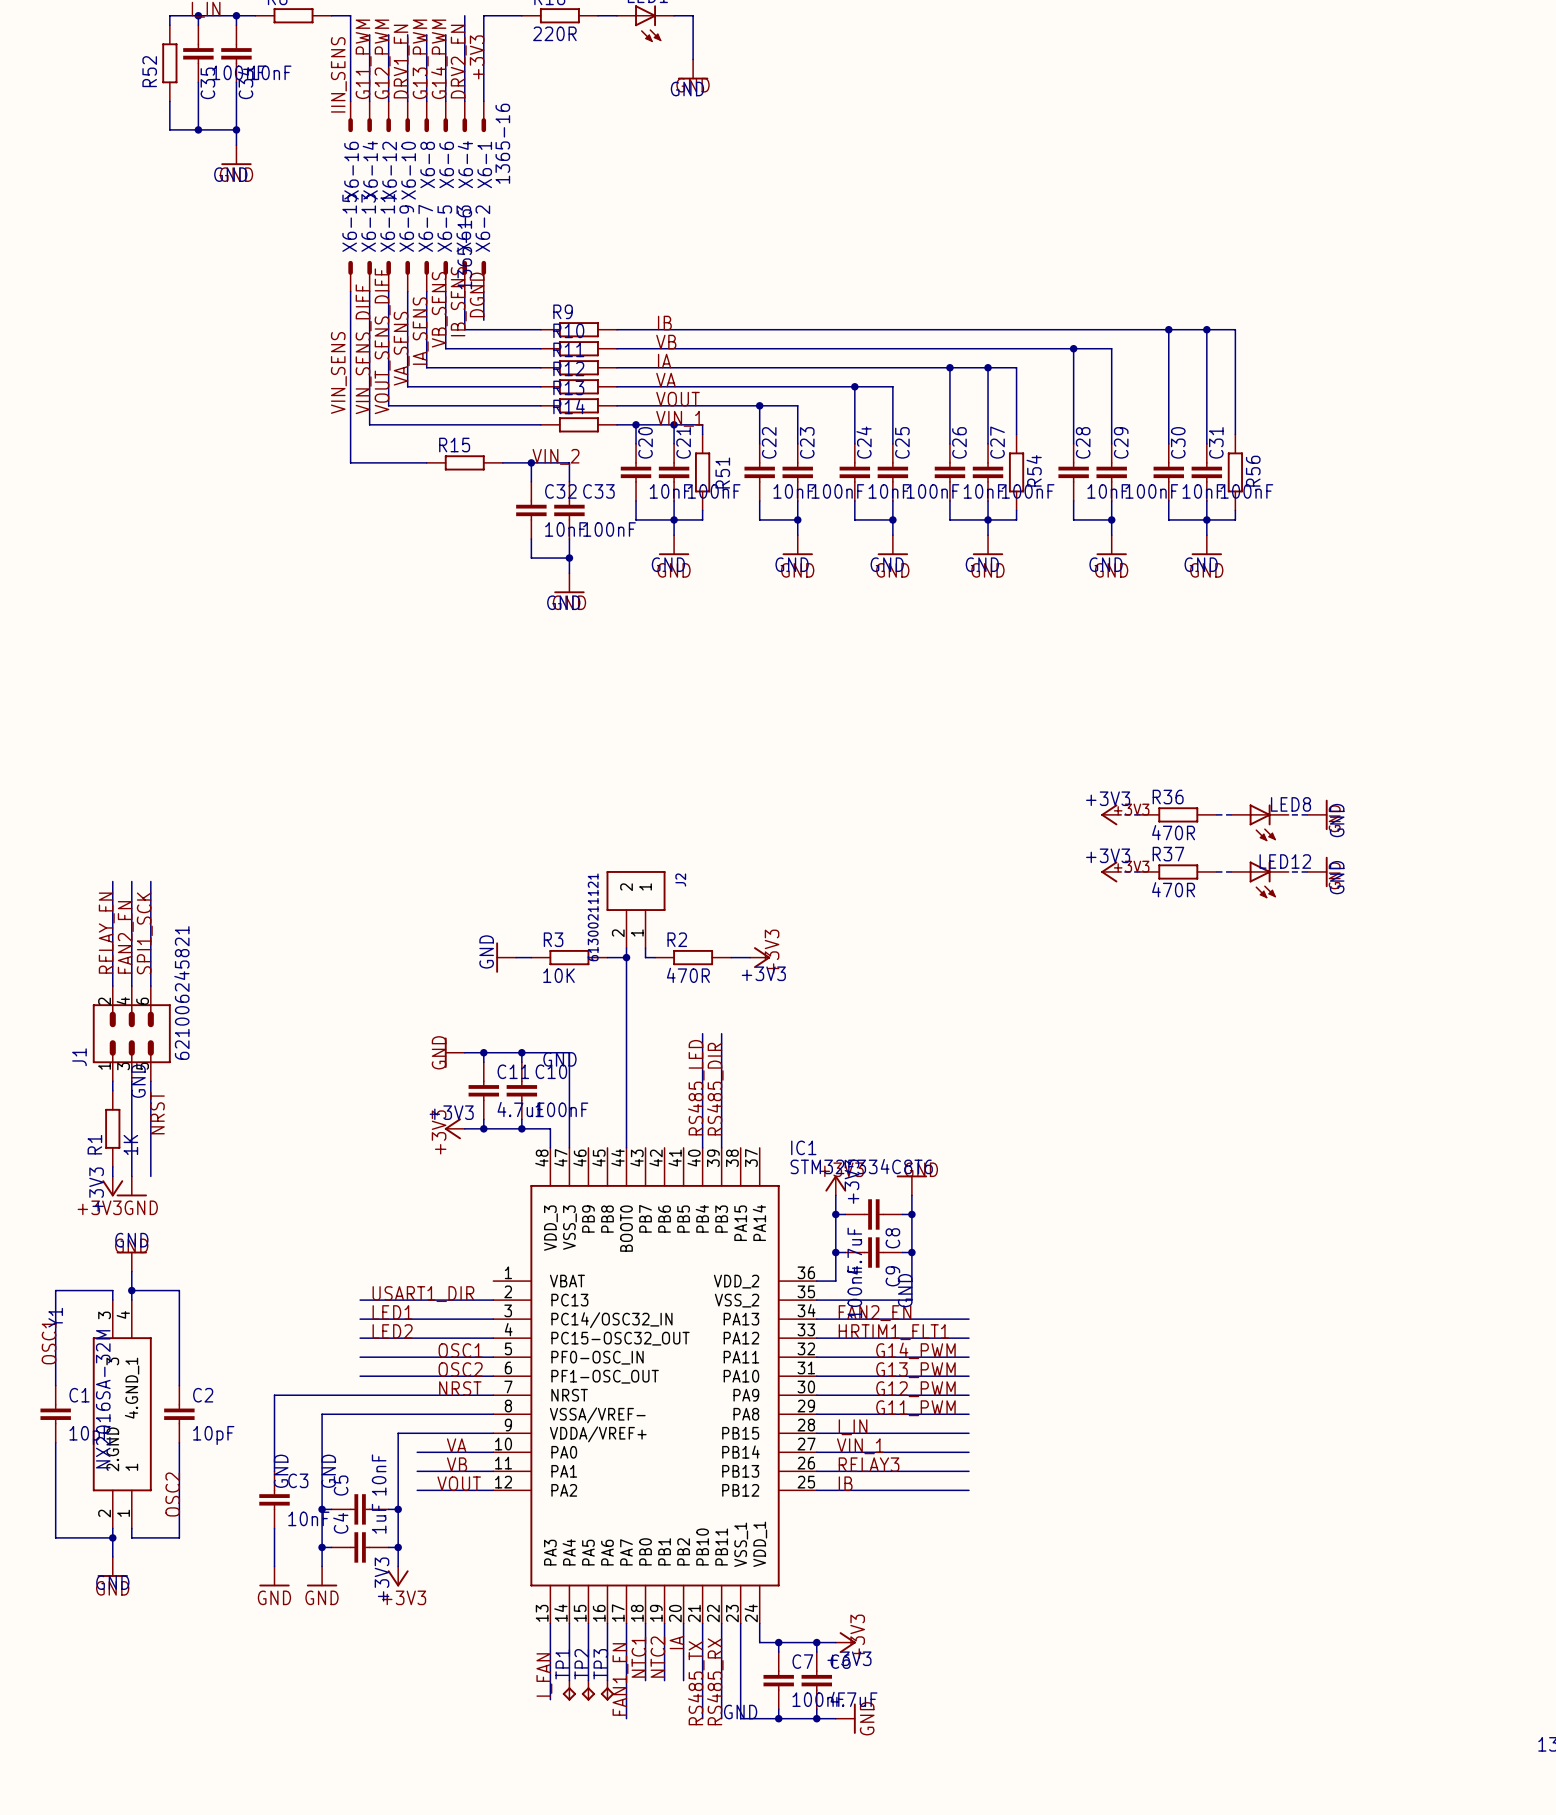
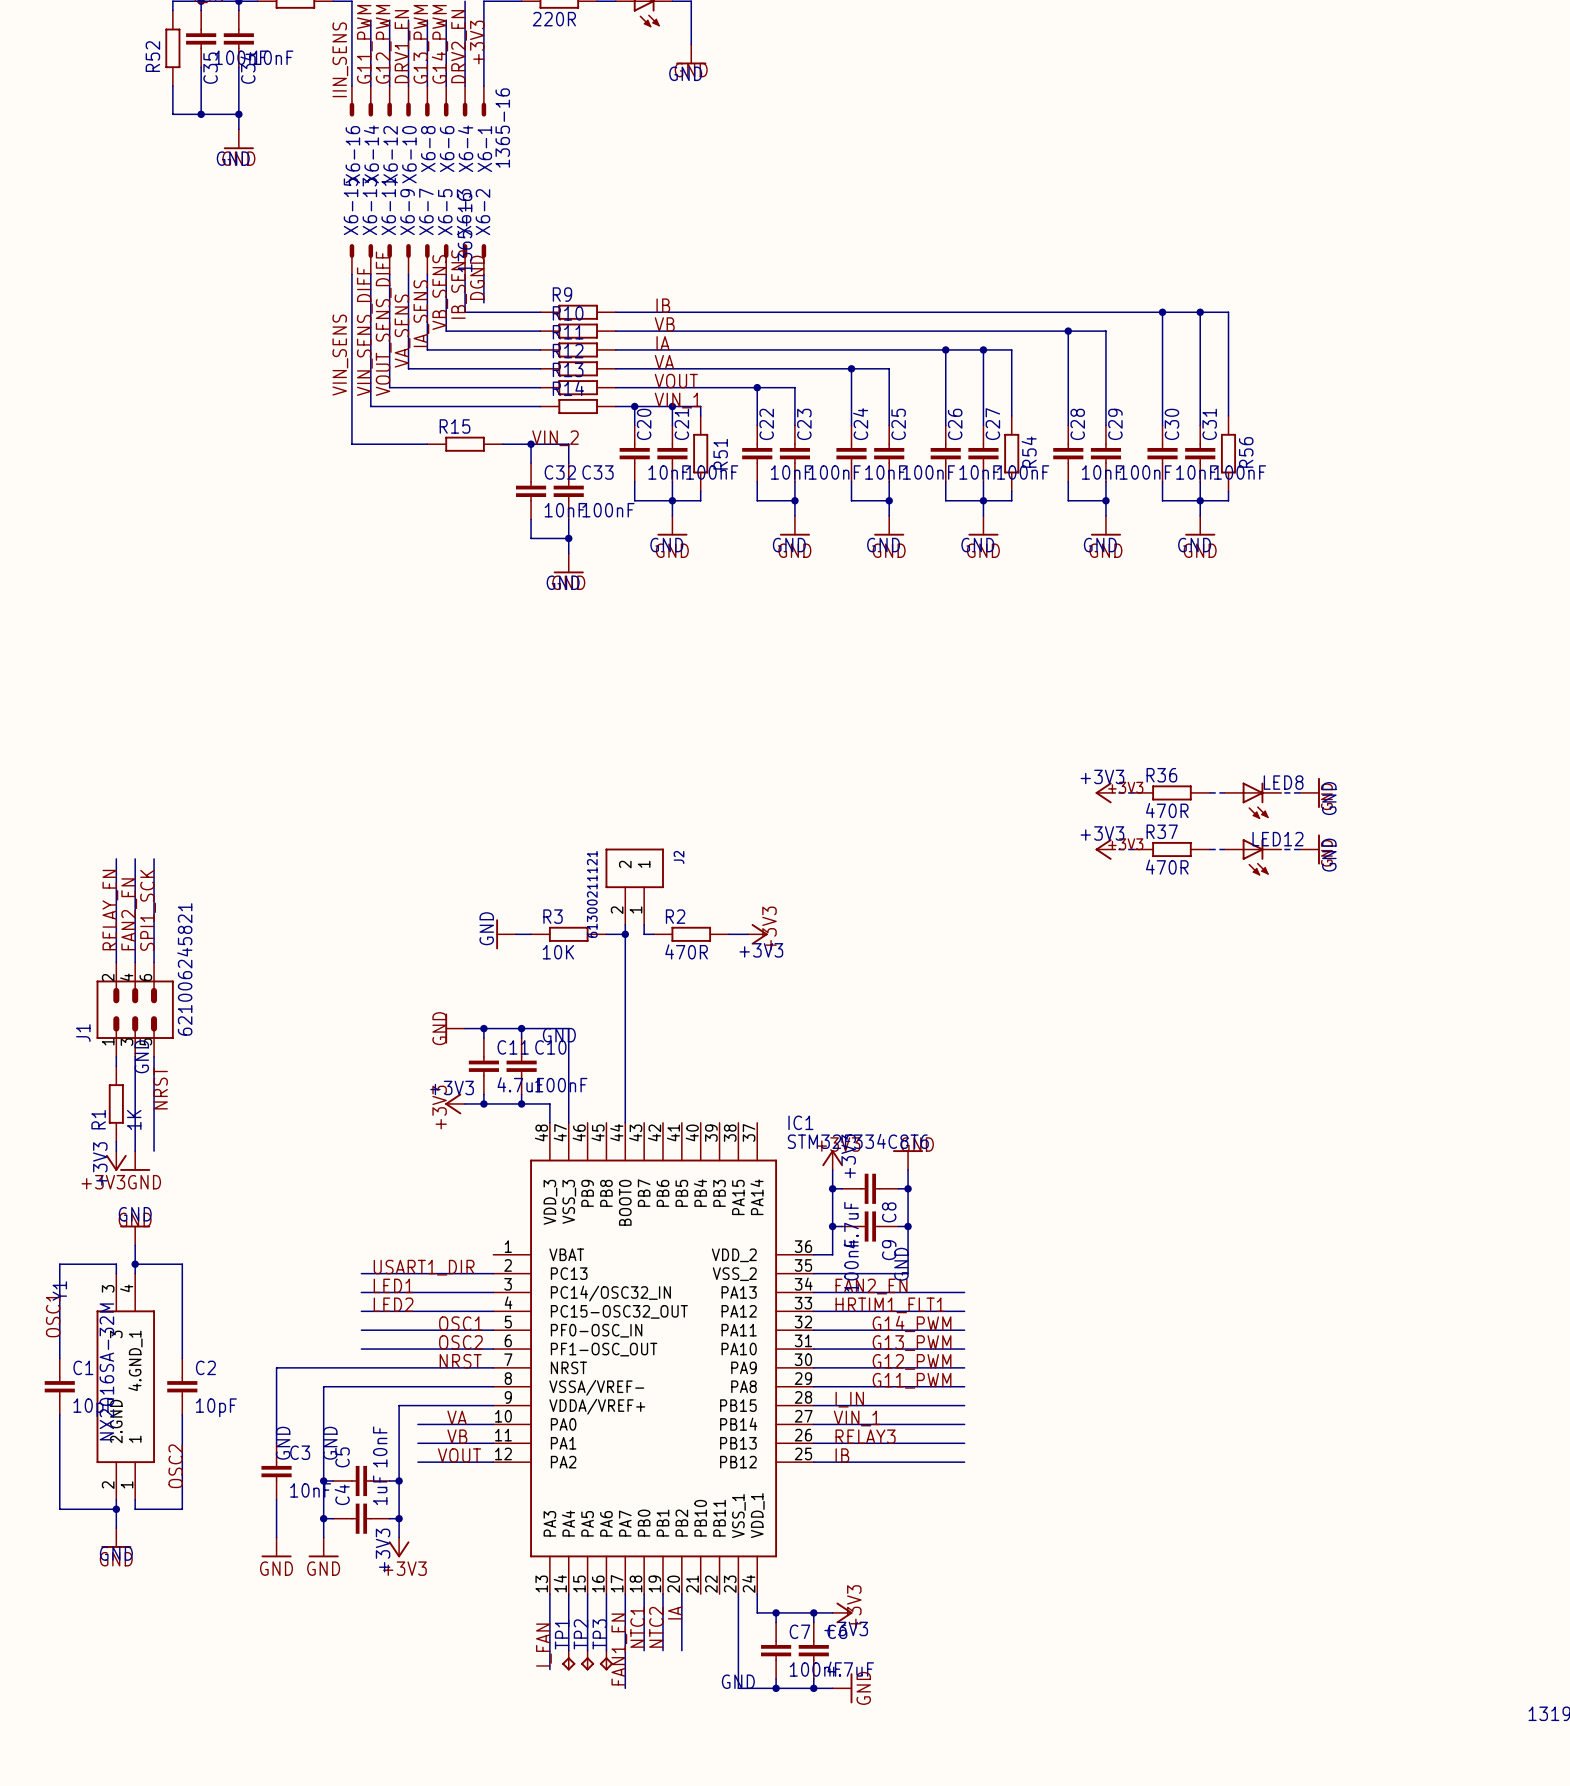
wire: (702, 1033) (702, 1147) -> none
wire: (721, 1033) (721, 1147) -> none
label: RS485_LED (696, 1087) -> none
label: RS485_DIR (715, 1089) -> none
wire: (702, 1623) (702, 1718) -> none
wire: (721, 1623) (721, 1718) -> none
label: RS485_RX (715, 1681) -> none
label: RS485_TX (696, 1683) -> none

